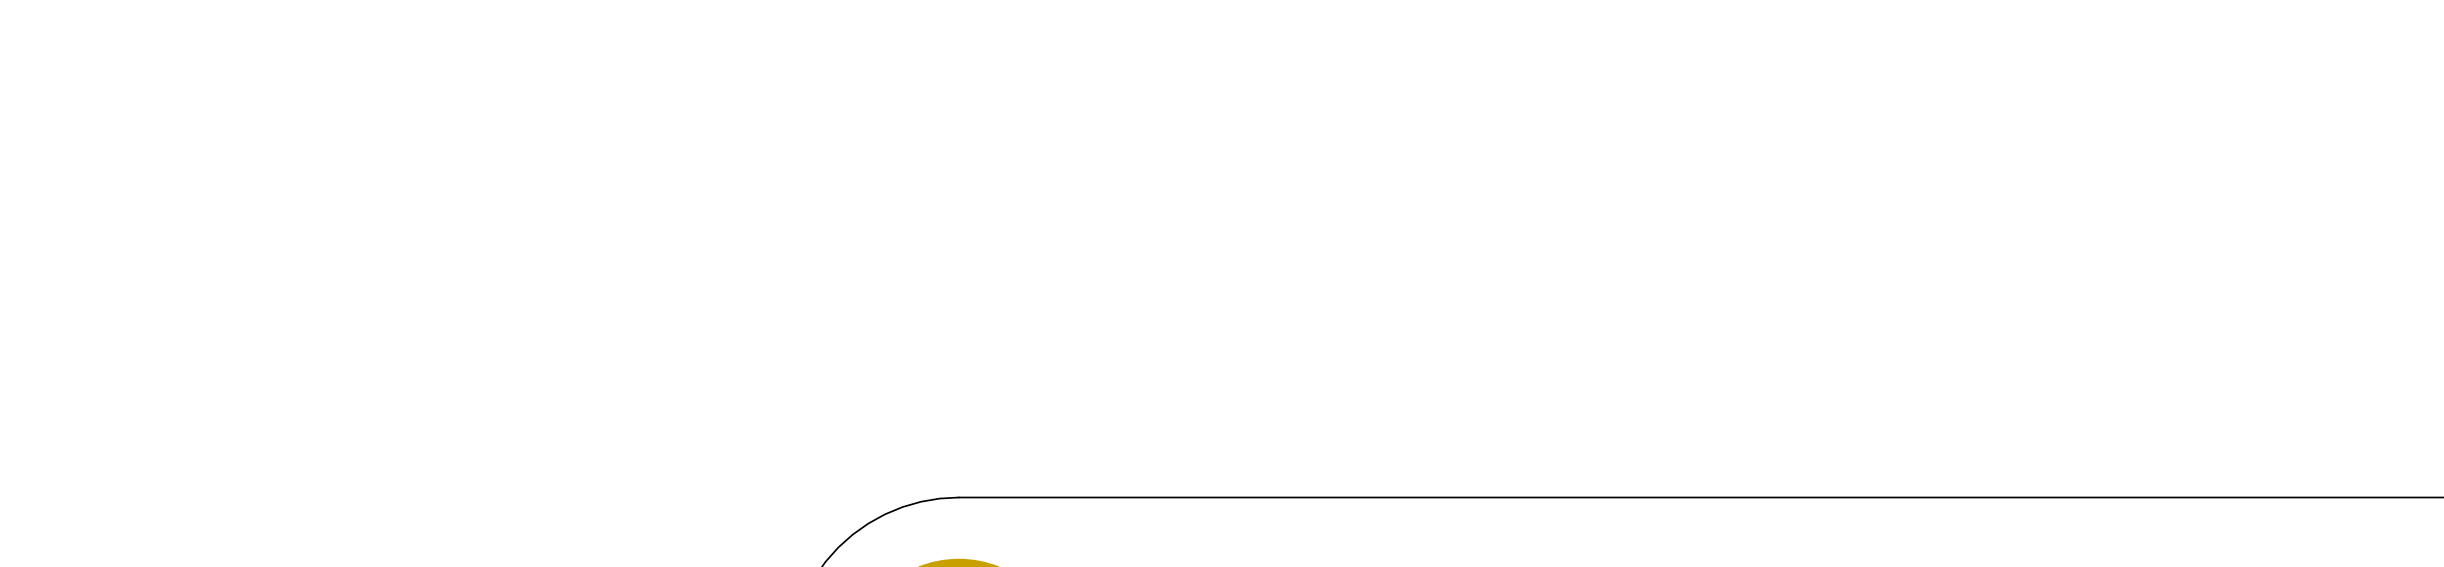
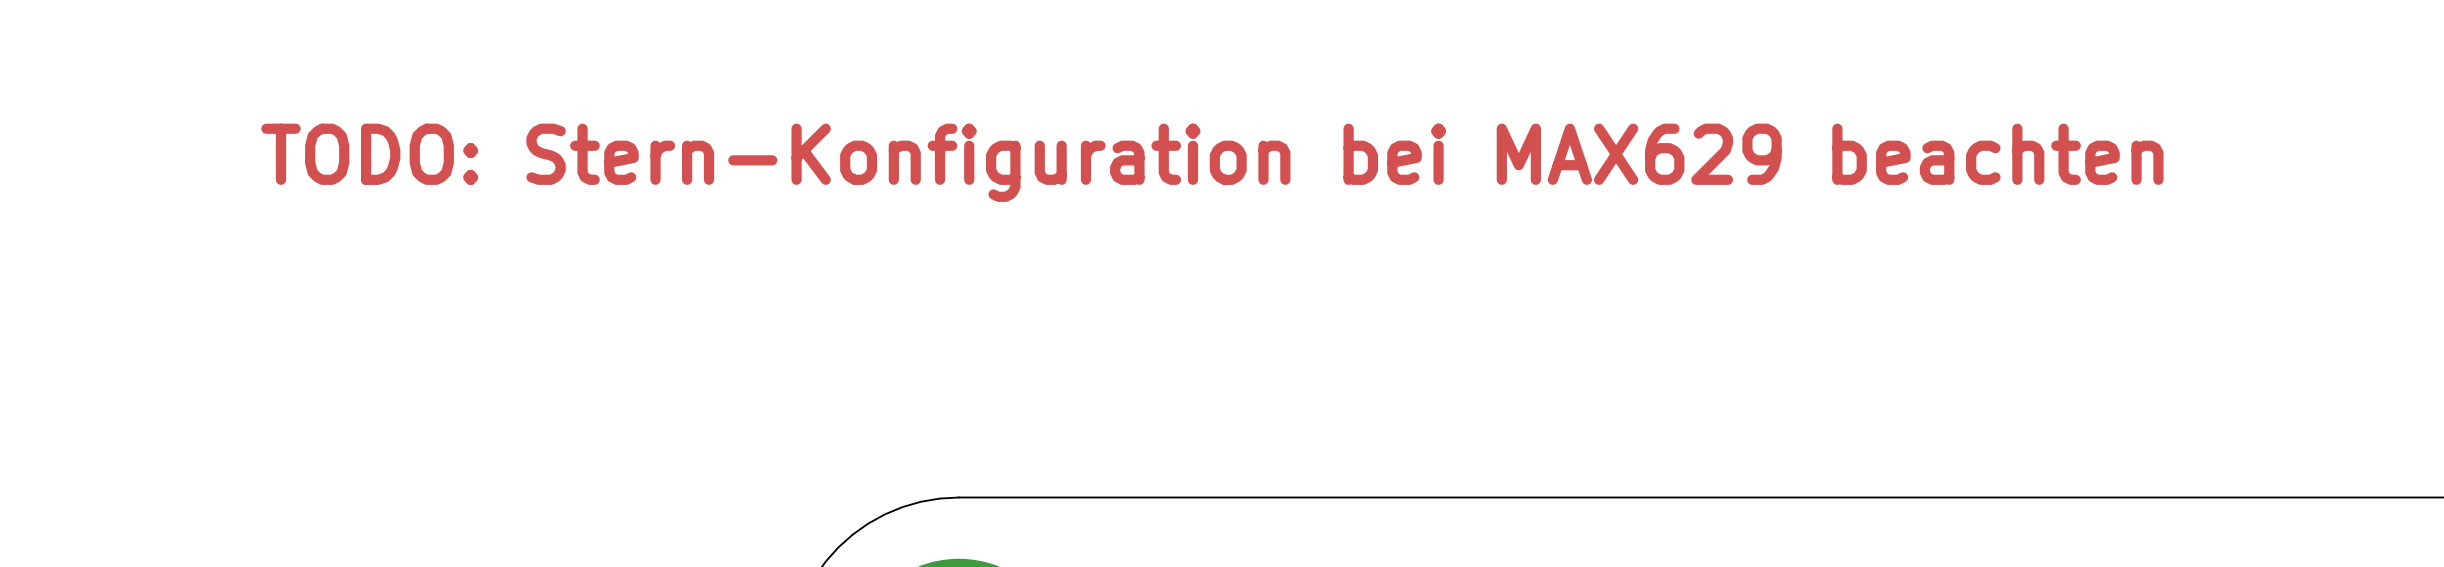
text: none -> TODO: Stern-Konfiguration bei MAX629 beachten (1212, 162)

